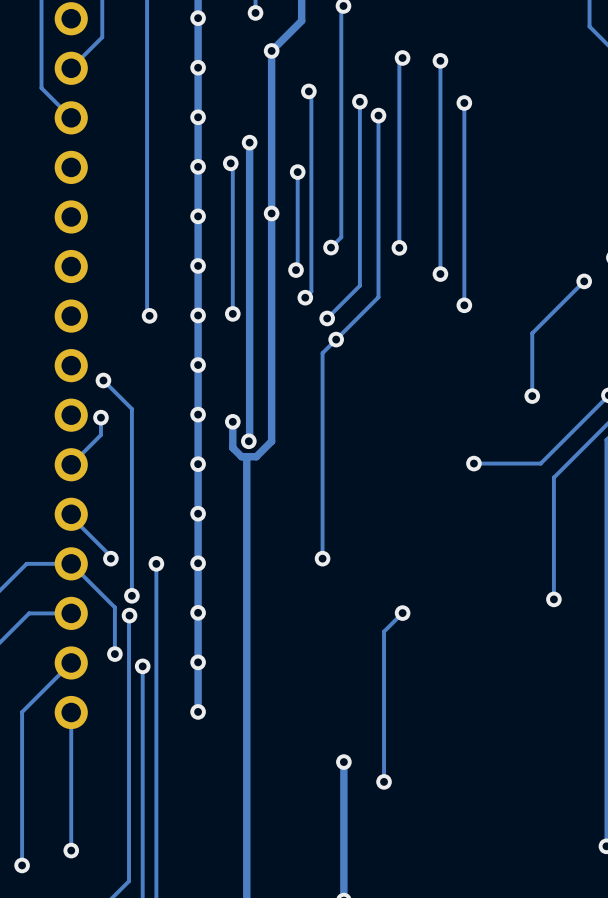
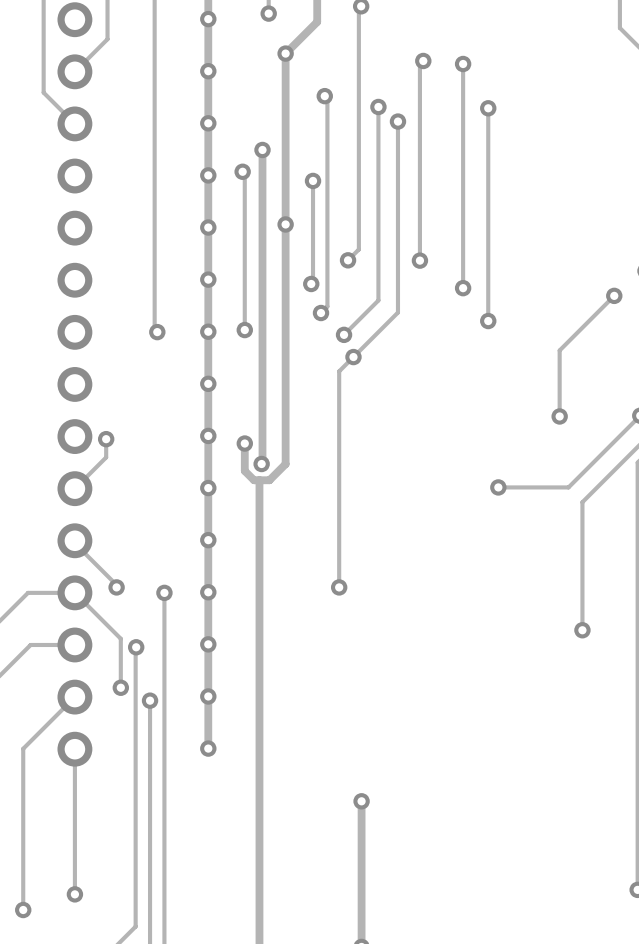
track: (103, 380) (131, 408) (131, 595) -> none
via: (103, 380) -> none
via: (131, 595) -> none
track: (402, 613) (384, 631) (384, 781) -> none
via: (402, 613) -> none
via: (384, 781) -> none

